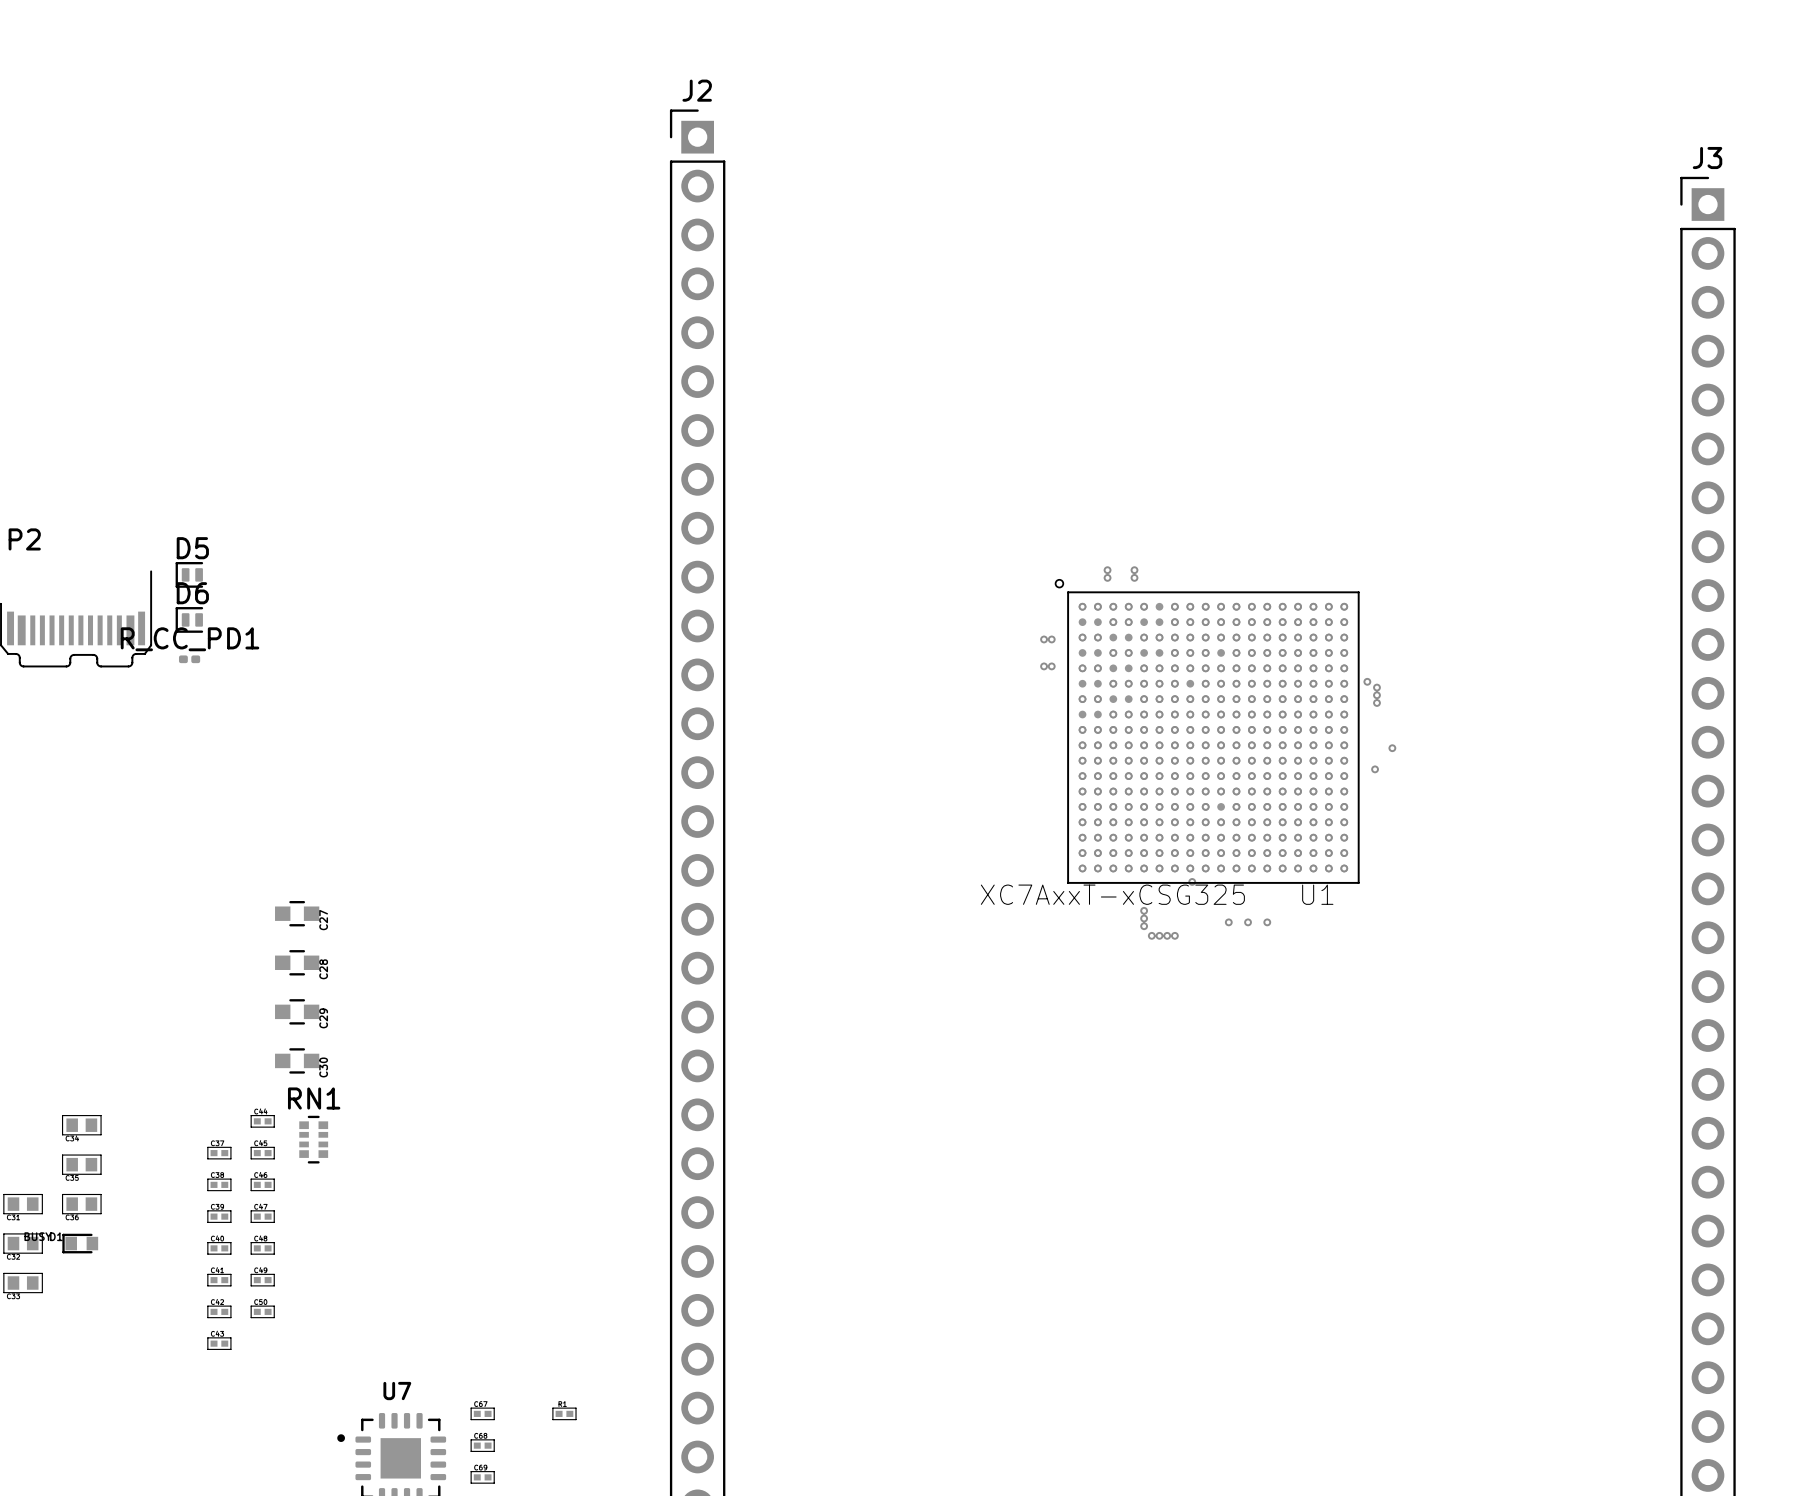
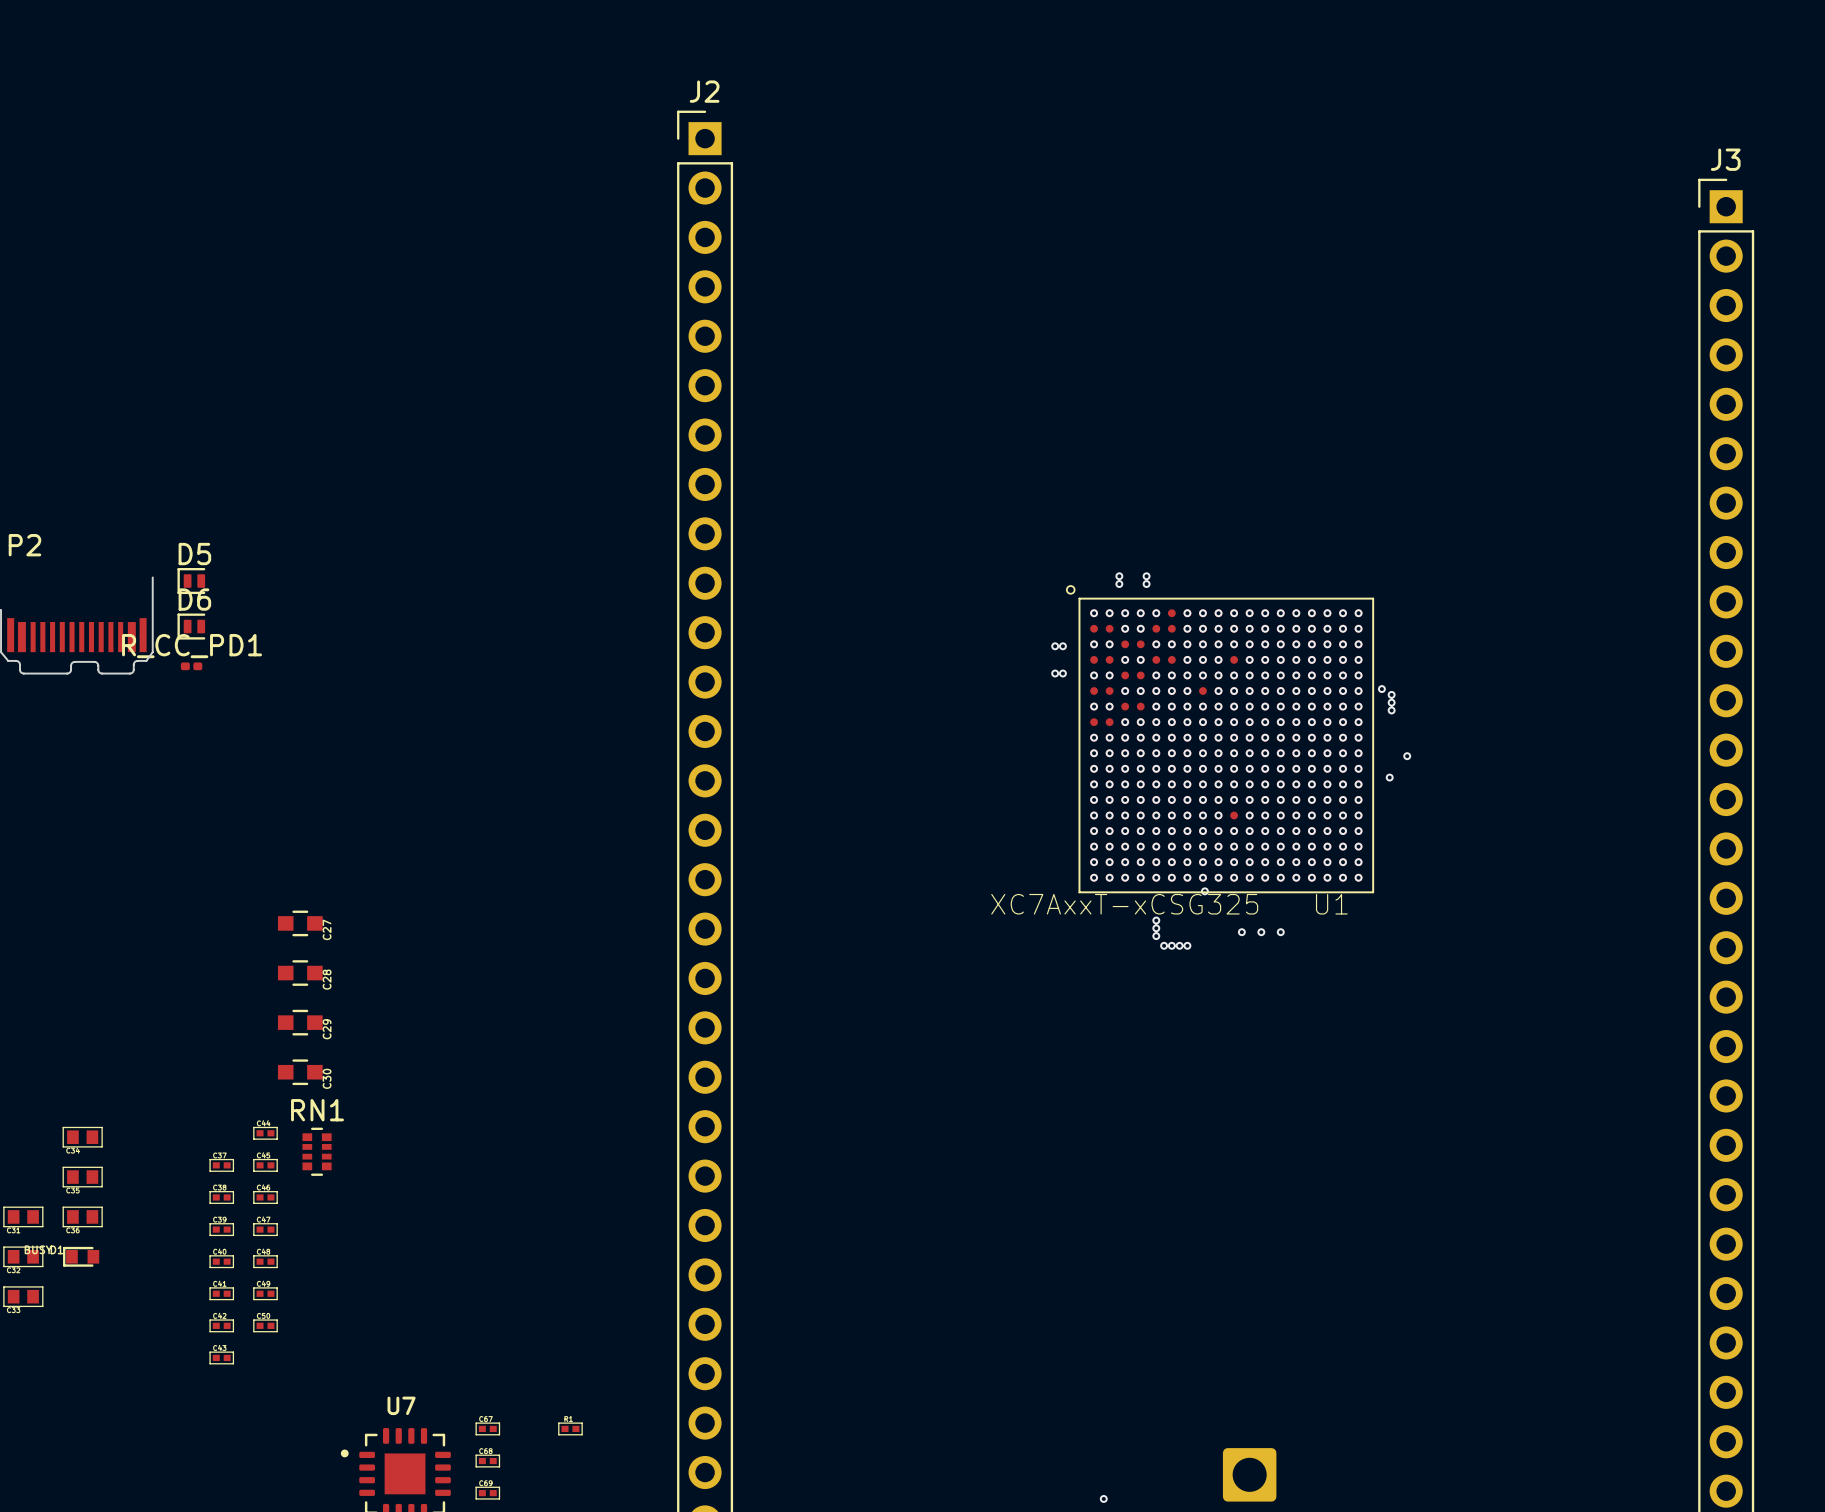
part: none -> (1249, 1474)
via: none -> (1103, 1498)

